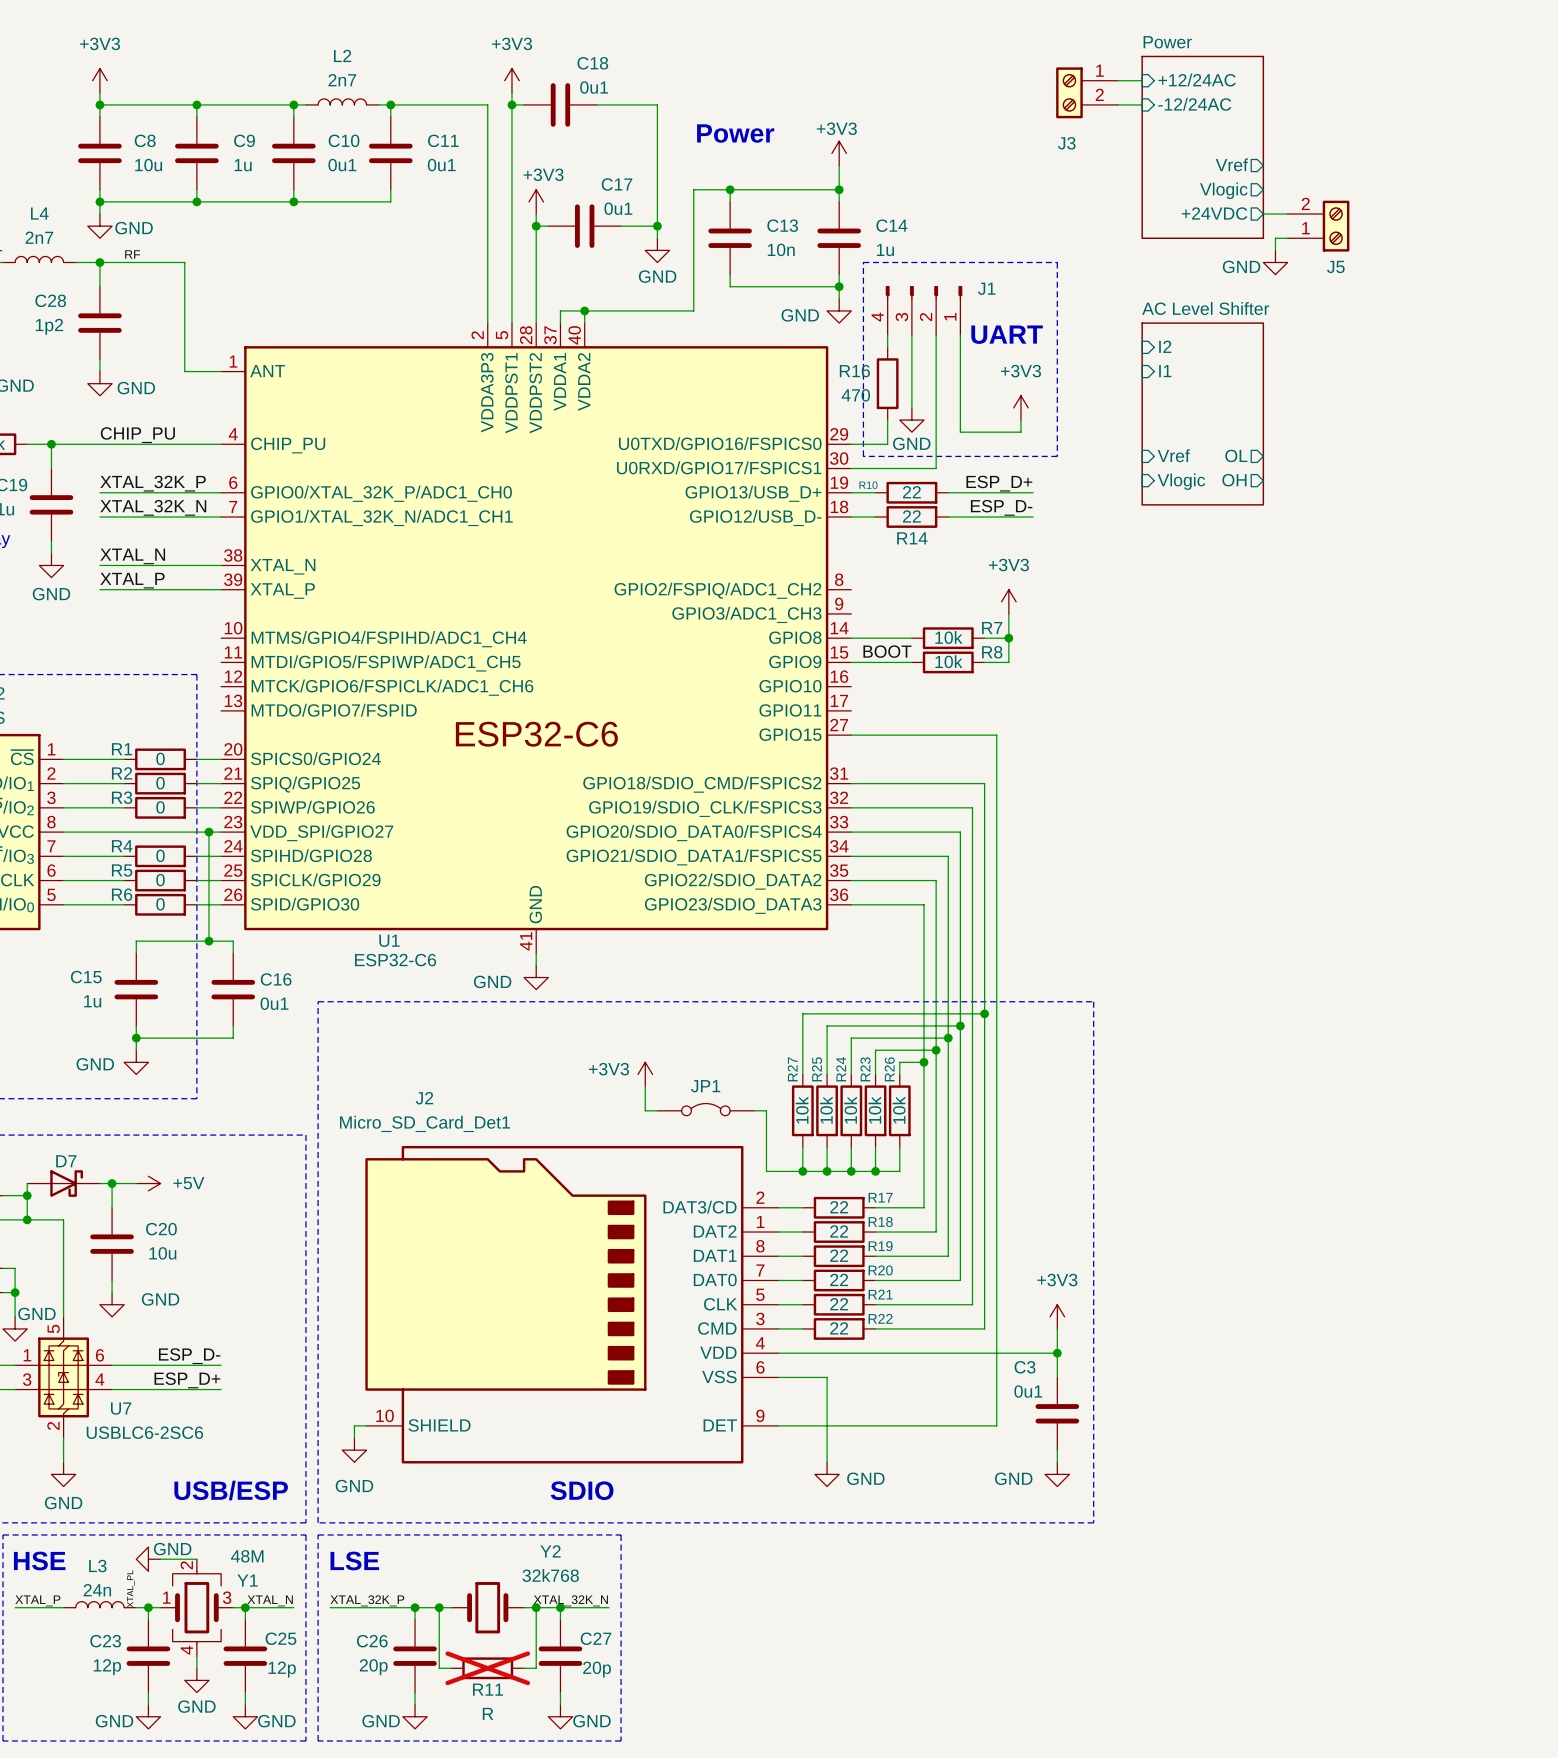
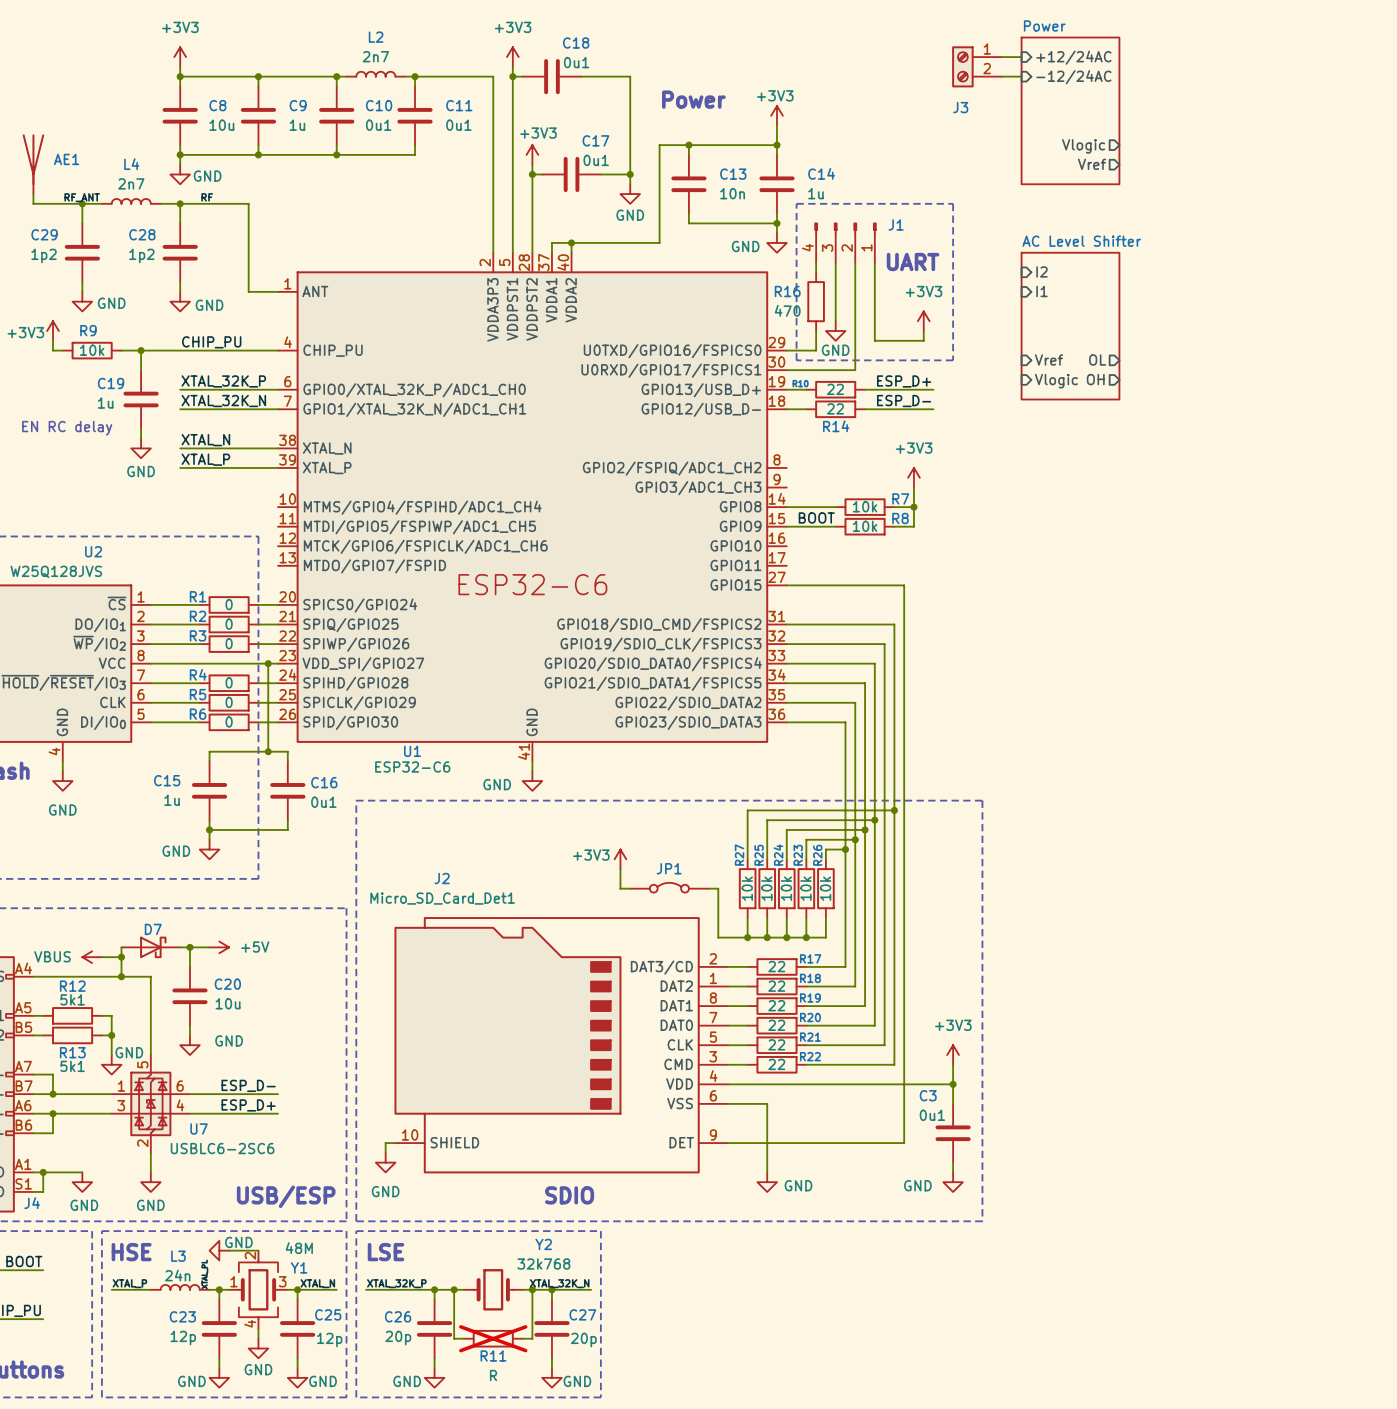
sheet pin: Vref (1231, 164) -> none
sheet pin: +24VDC (1214, 213) -> Vref (1092, 164)
wire: (1263, 214) (1287, 214) -> none
J5: (1318, 226) -> none
wire: (1287, 238) (1275, 238) (1275, 250) -> none
power symbol: GND (1275, 262) -> none

